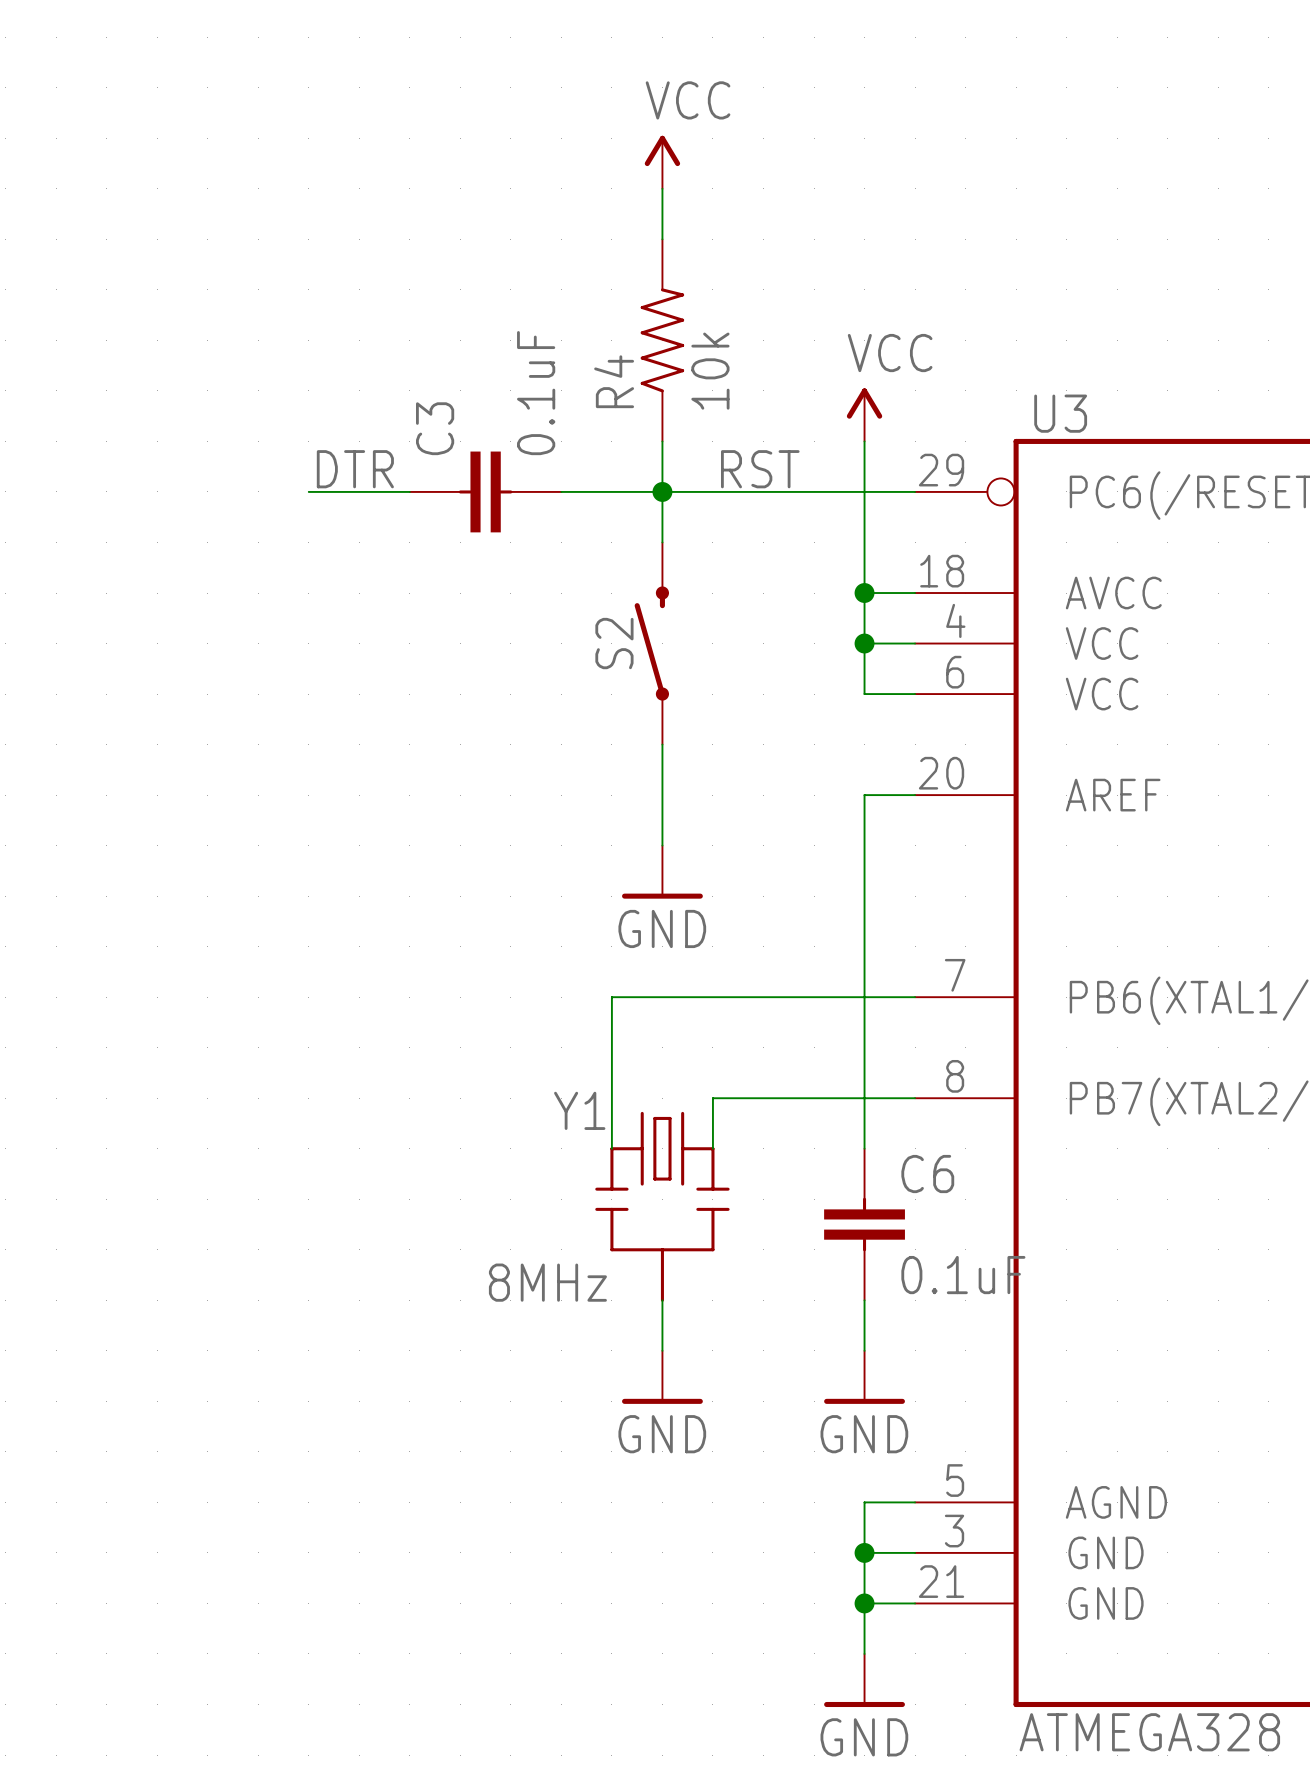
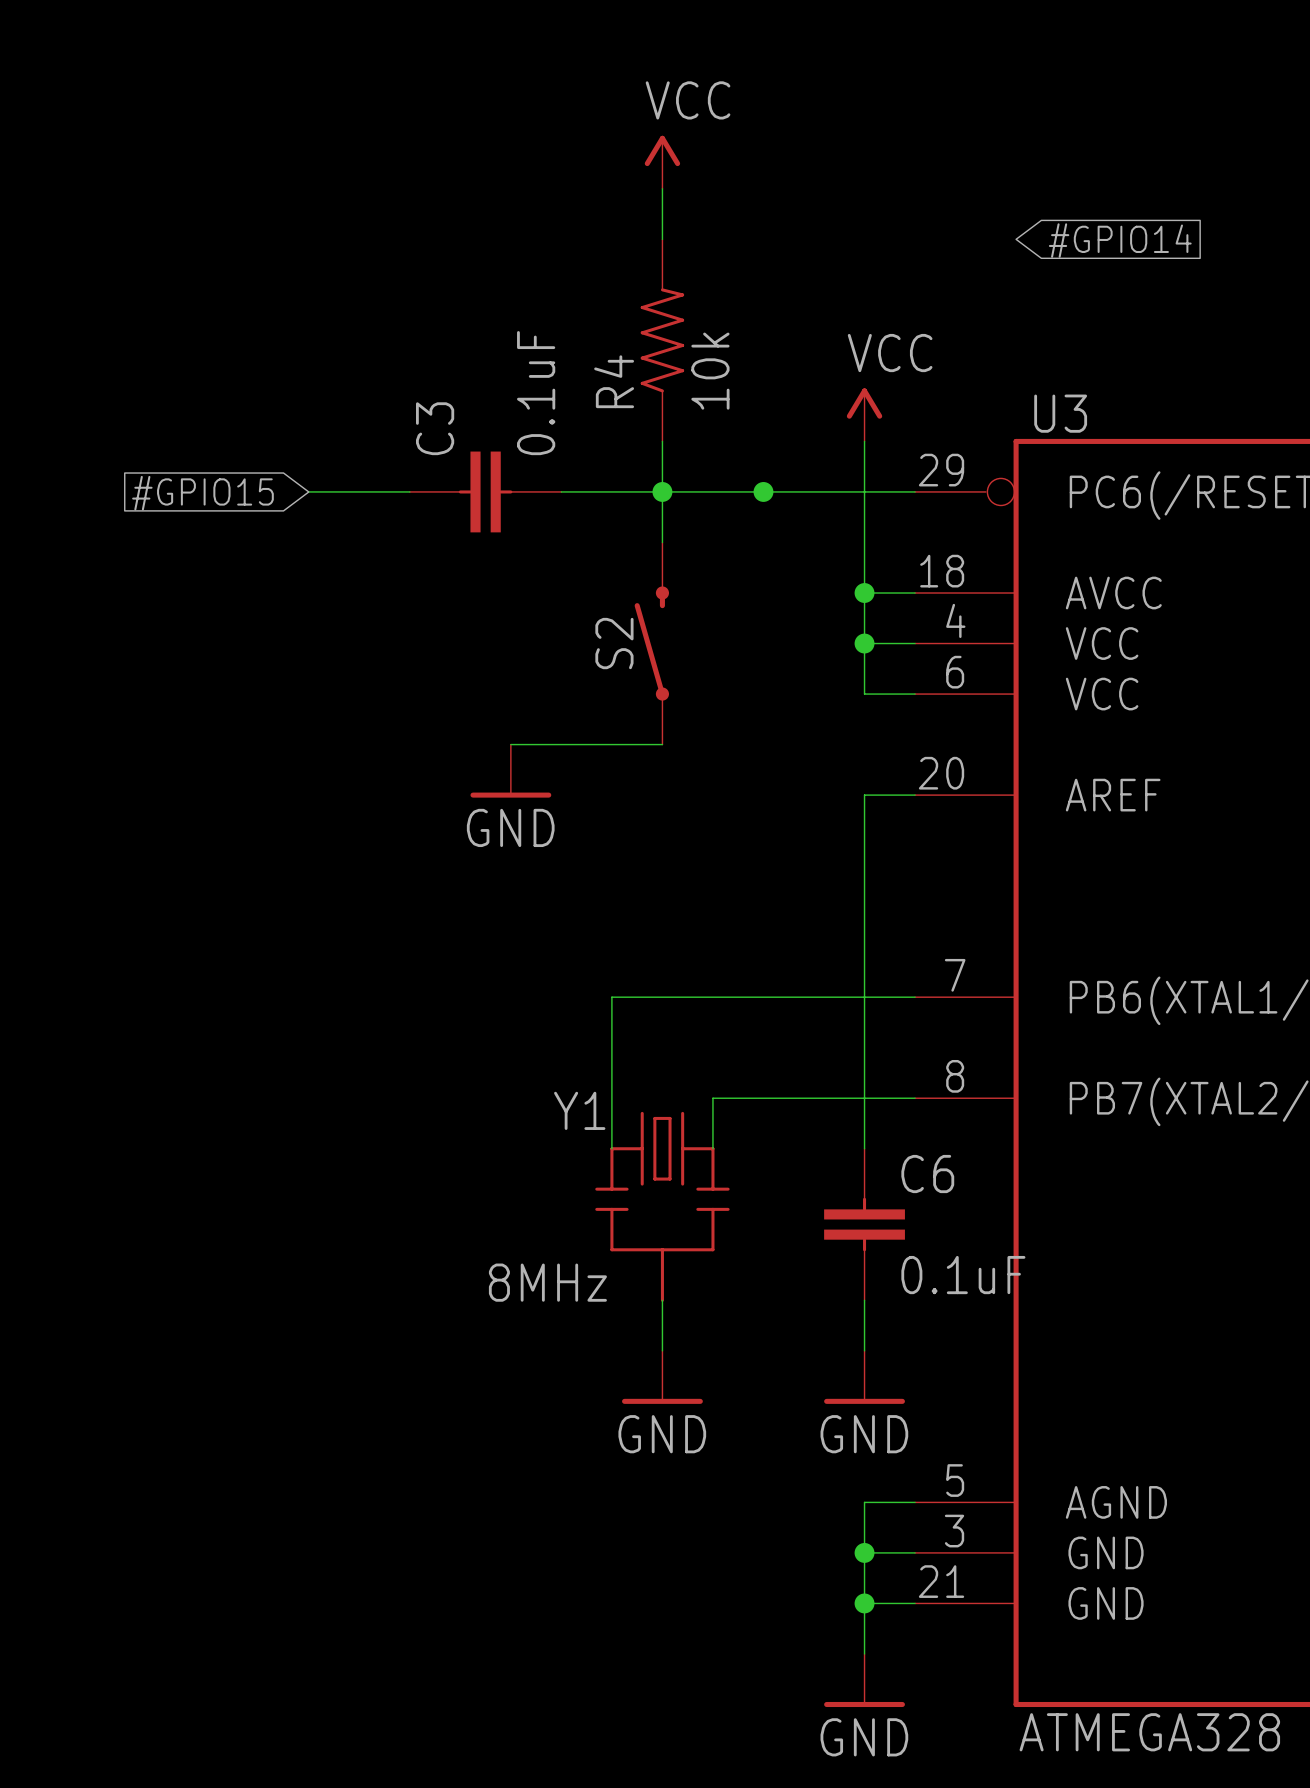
global label: none -> #GPIO14 (1120, 240)
label: DTR (355, 469) -> none
label: RST (760, 469) -> none
junction: none -> (763, 491)
global label: none -> #GPIO15 (202, 493)
wire: (662, 744) (662, 845) -> (662, 744) (510, 744)
power symbol position: GND (662, 872) -> GND (510, 771)

